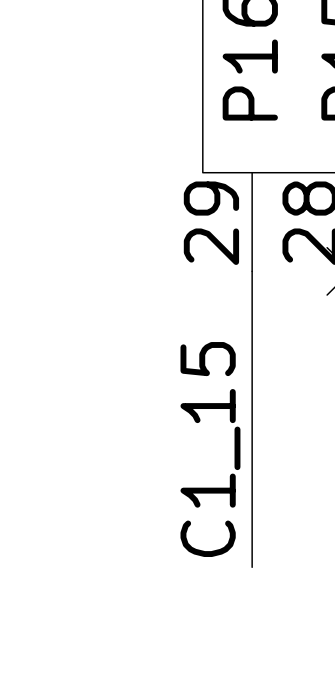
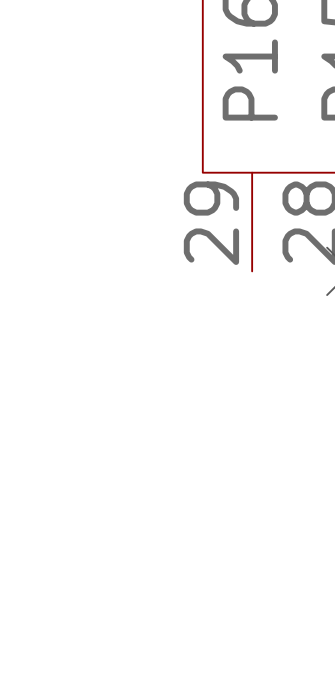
wire: (252, 271) (252, 567) -> none
label: C1_15 (210, 449) -> none

